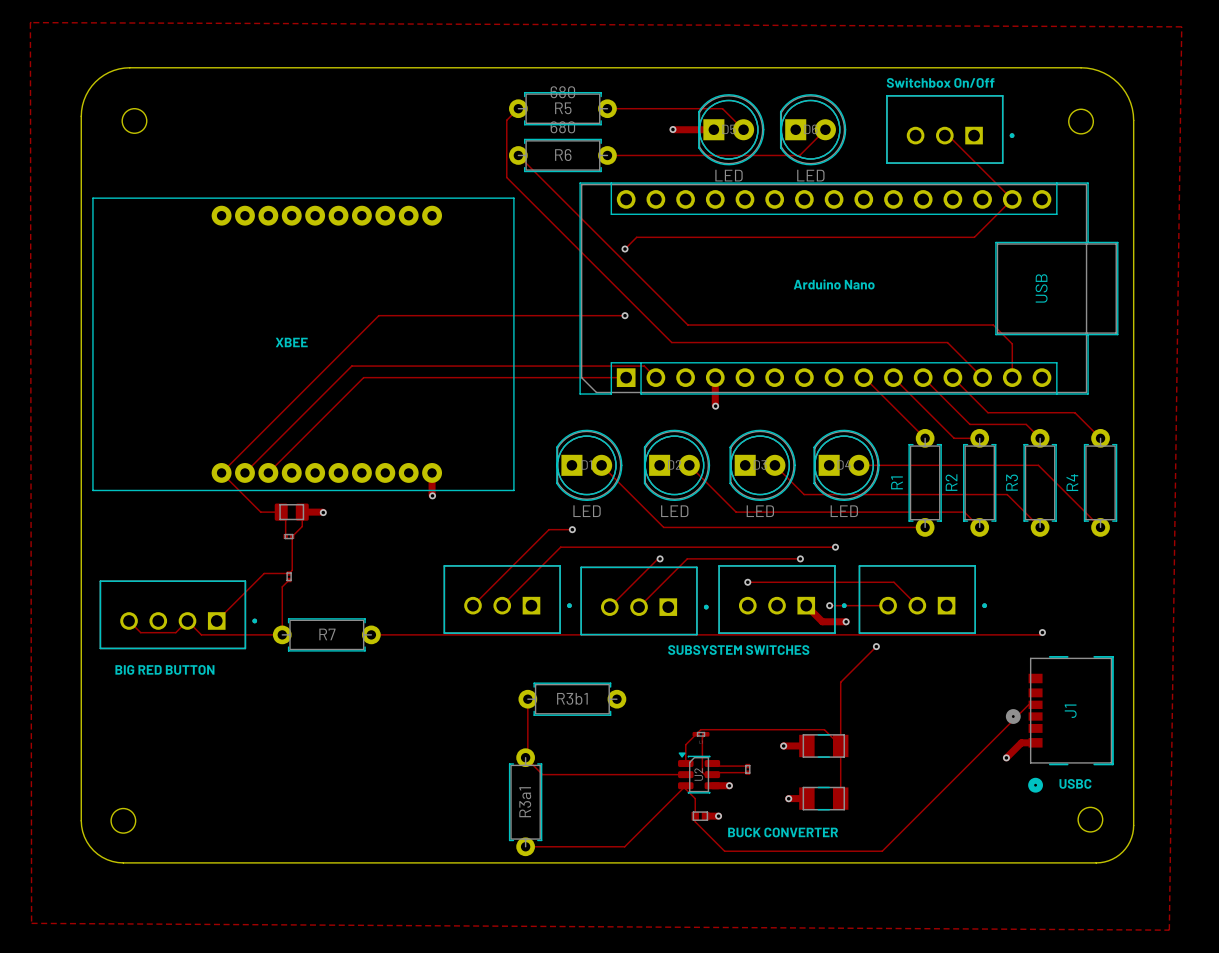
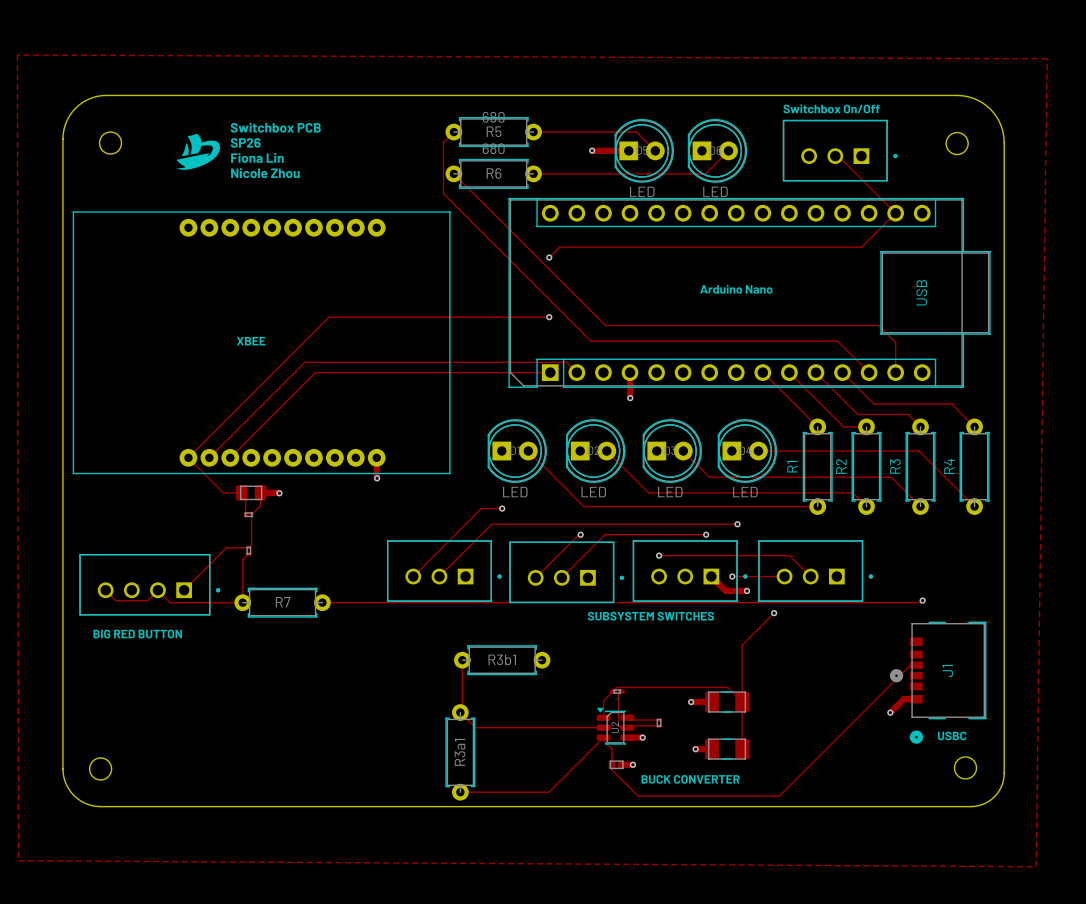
text: none -> Switchbox PCB (275, 127)
drawing: none -> [176, 133, 220, 170]
text: none -> SP26 (245, 142)
text: none -> Fiona Lin (257, 157)
text: none -> Nicole Zhou (265, 173)

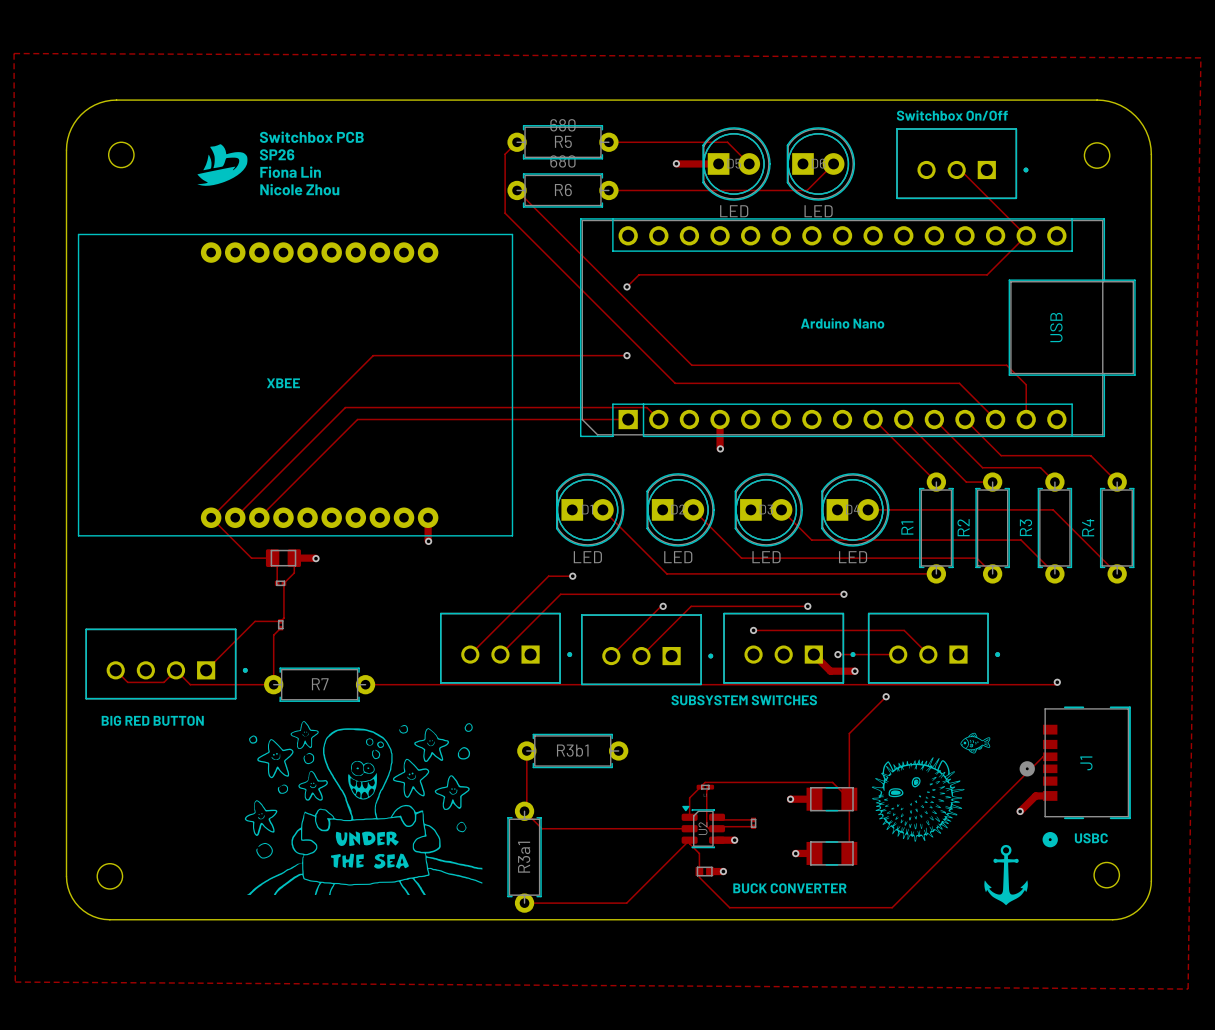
drawing: none -> [244, 721, 483, 895]
drawing: none -> [871, 732, 991, 842]
drawing: none -> [984, 844, 1028, 906]

